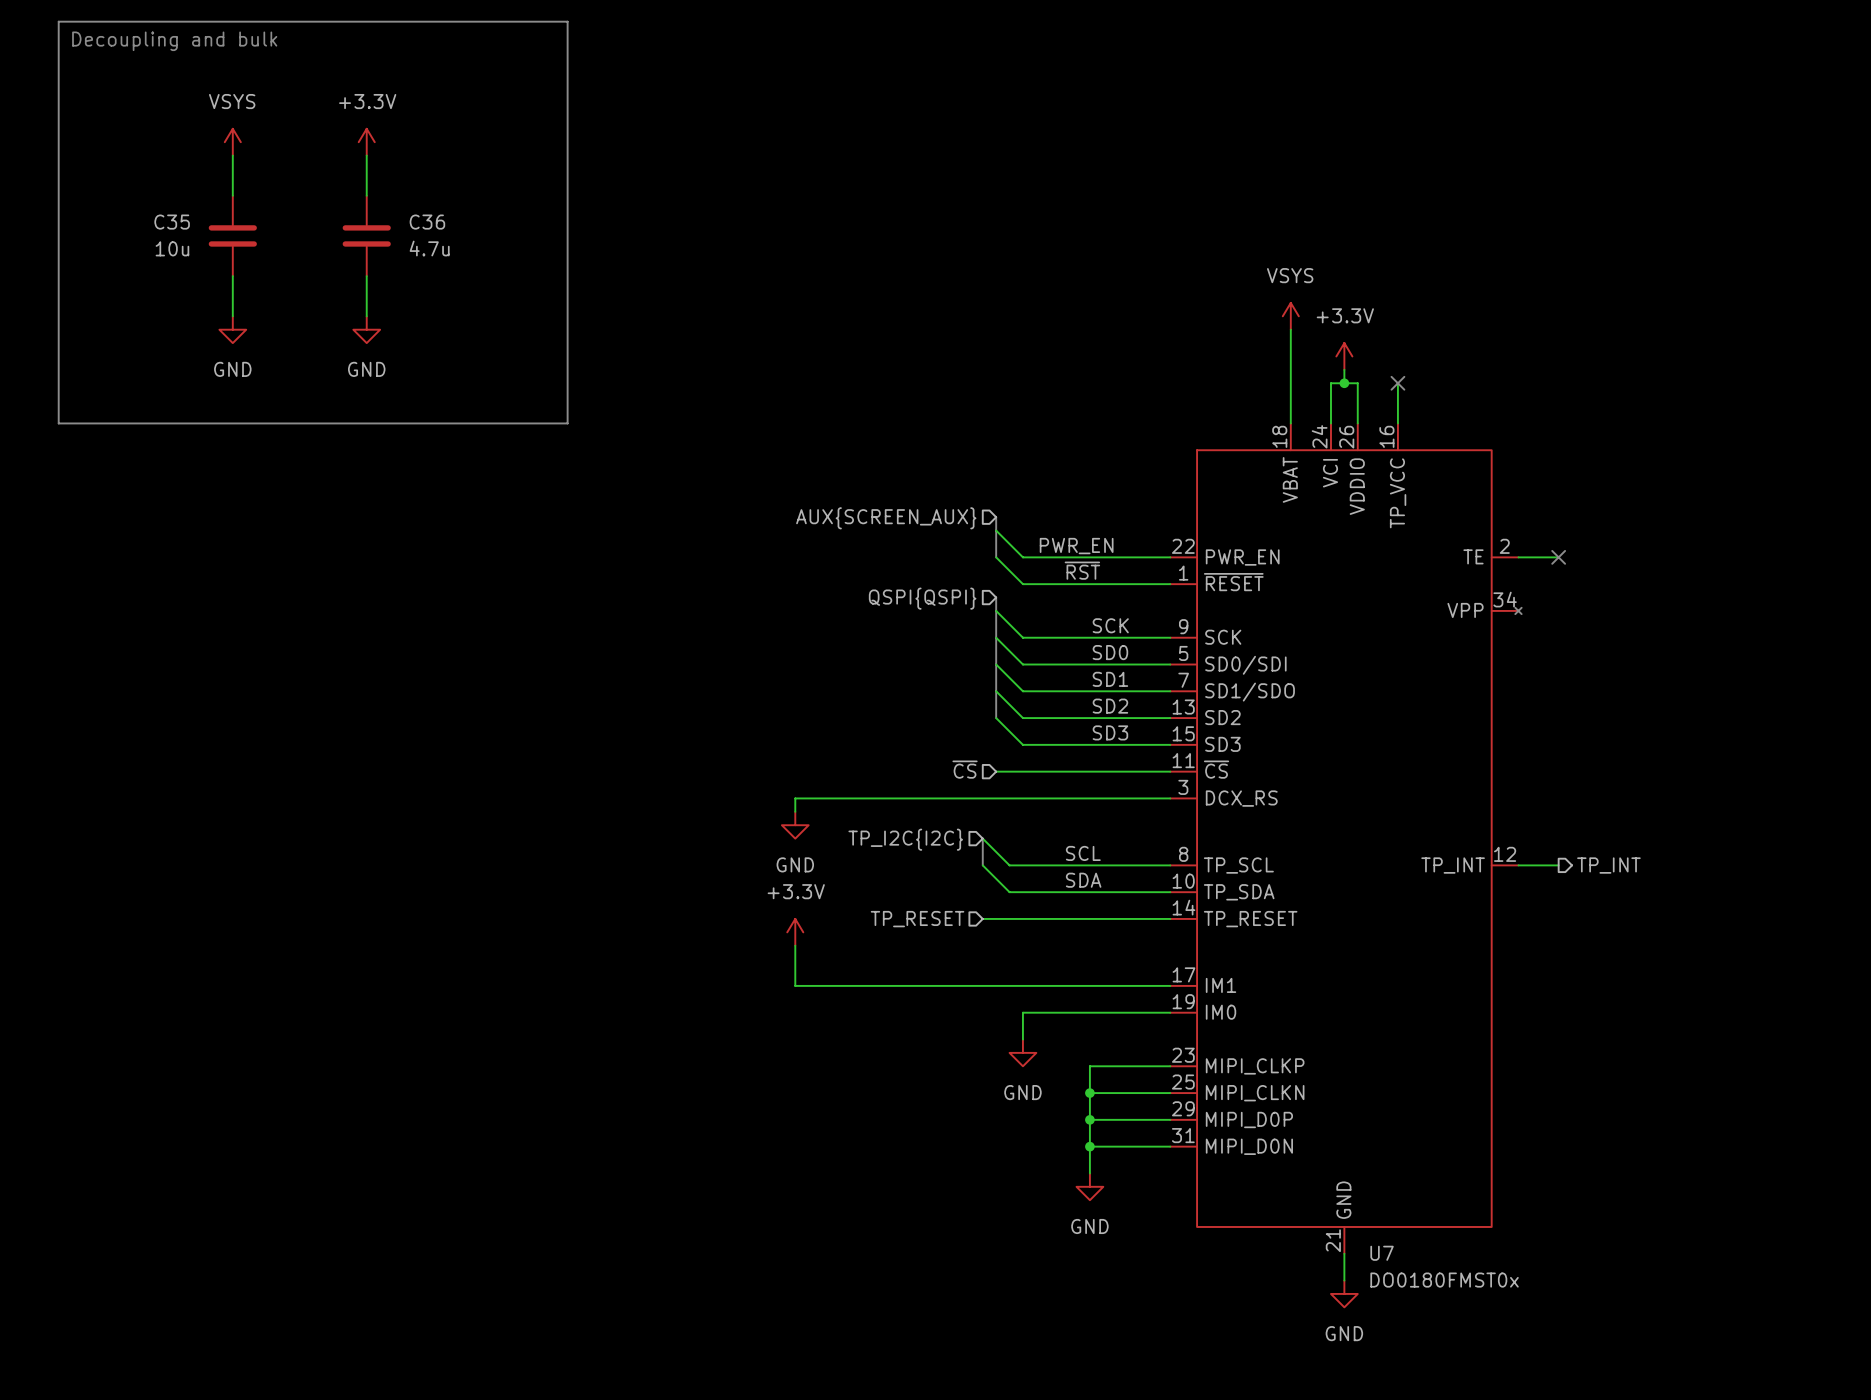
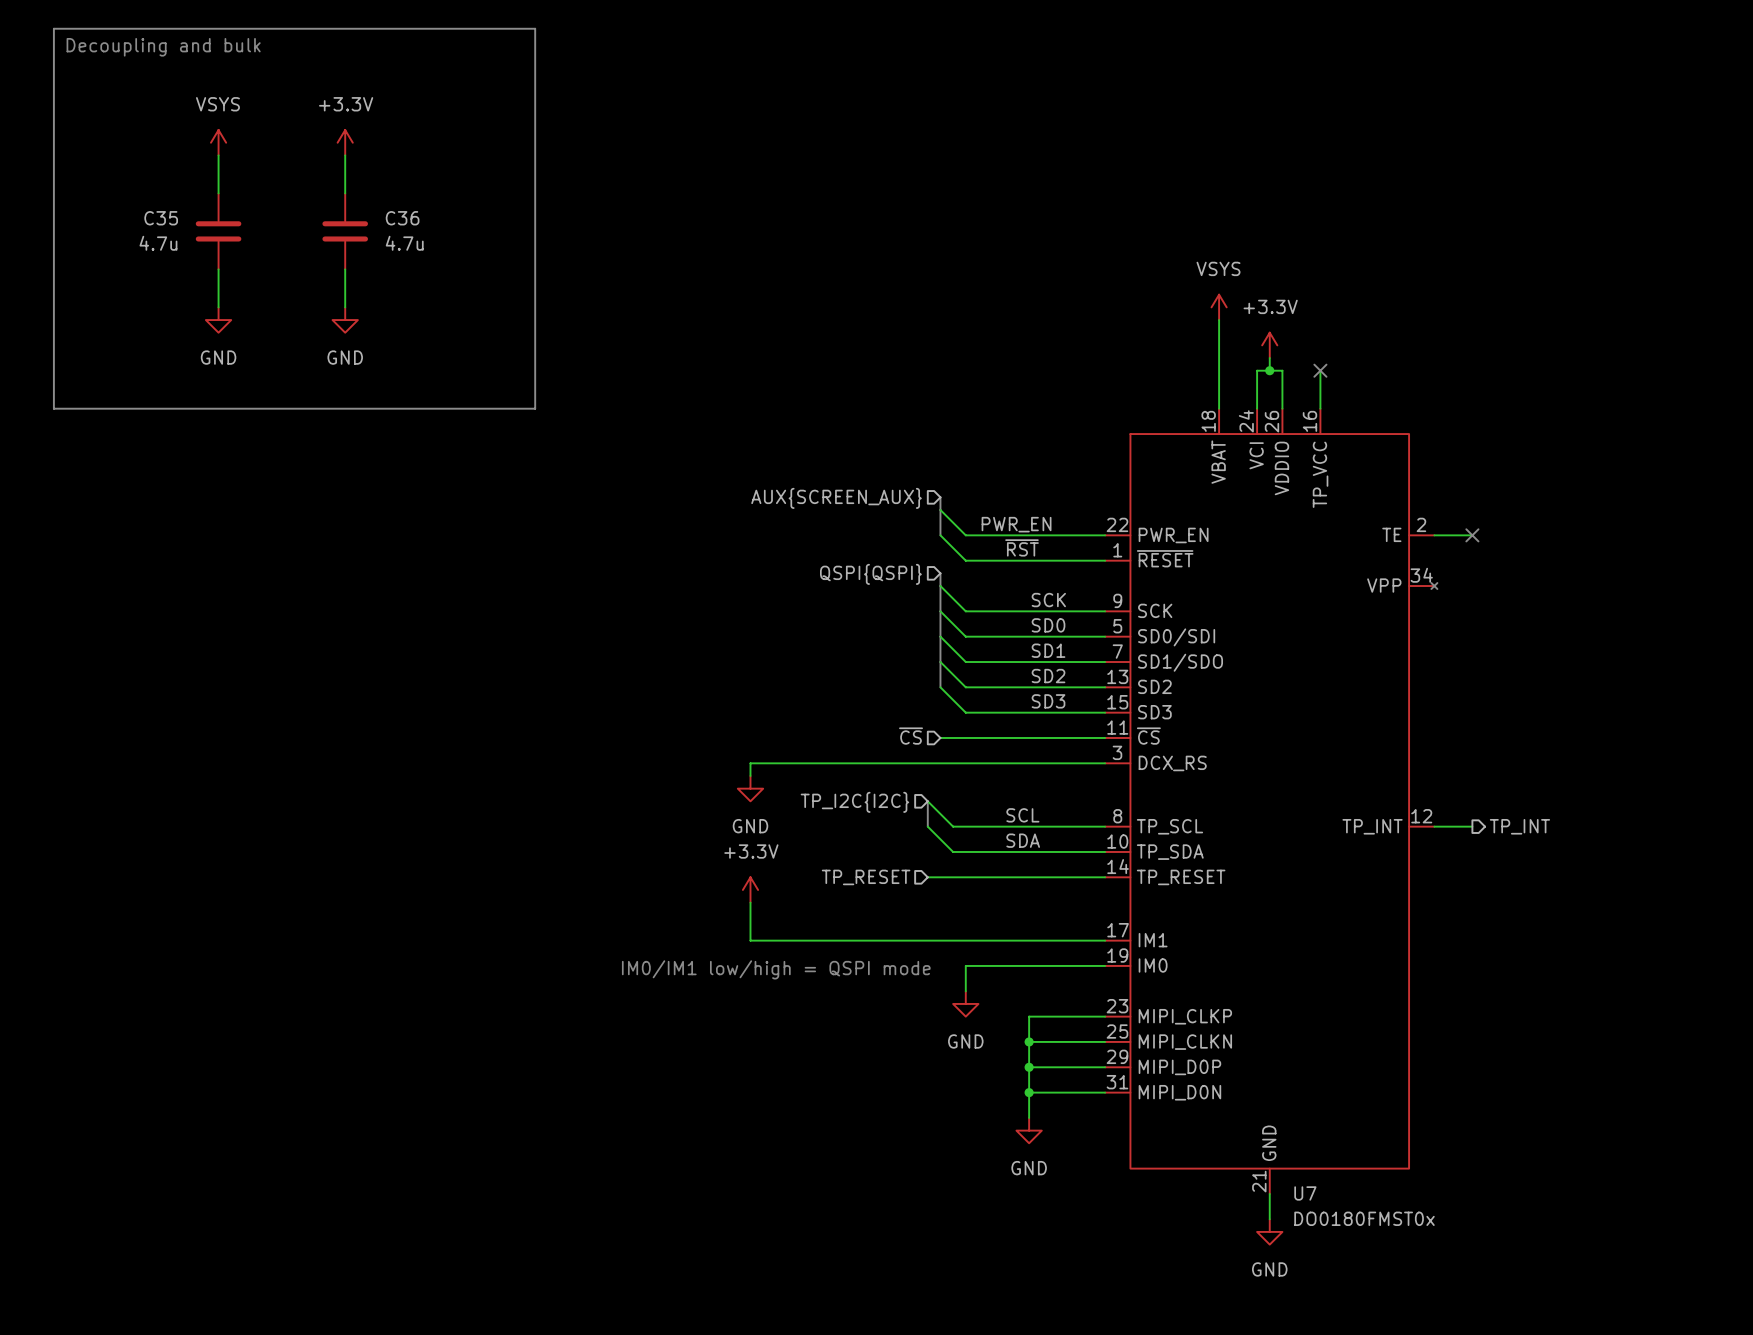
C35 value: 10u (172, 248) -> 4.7u (158, 243)
text: none -> IM0/IM1 low/high = QSPI mode (776, 969)

